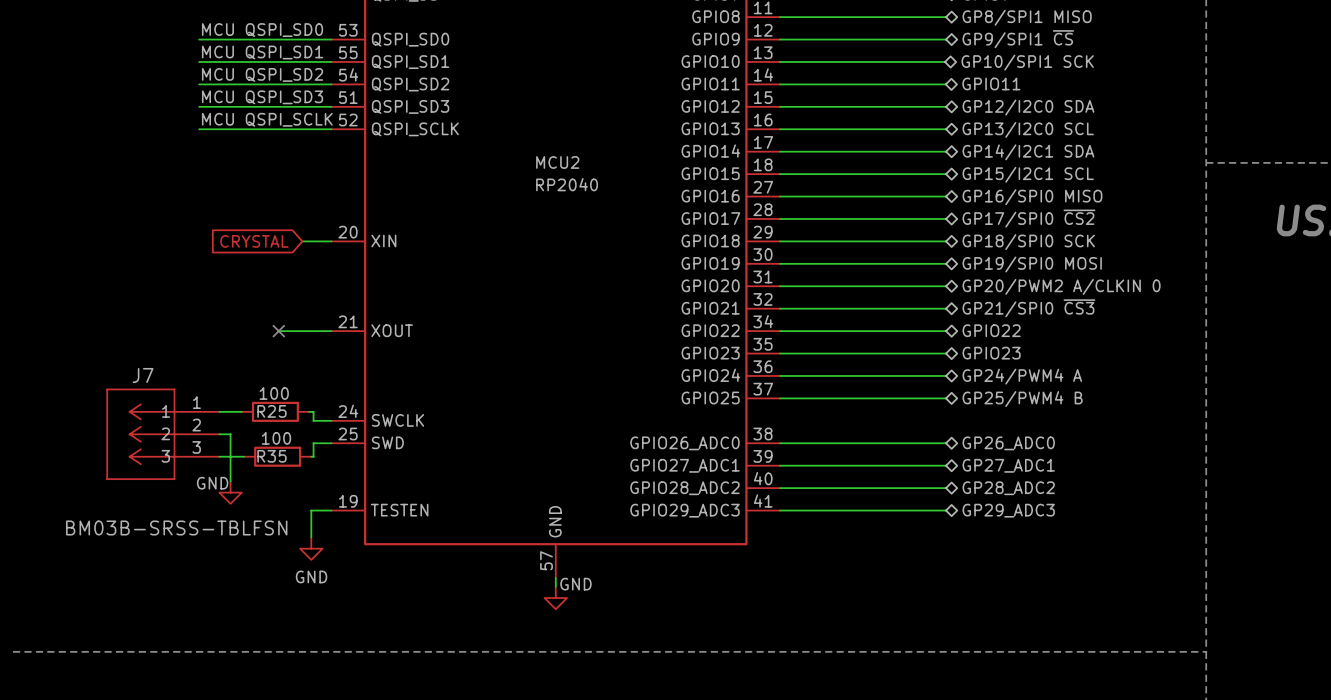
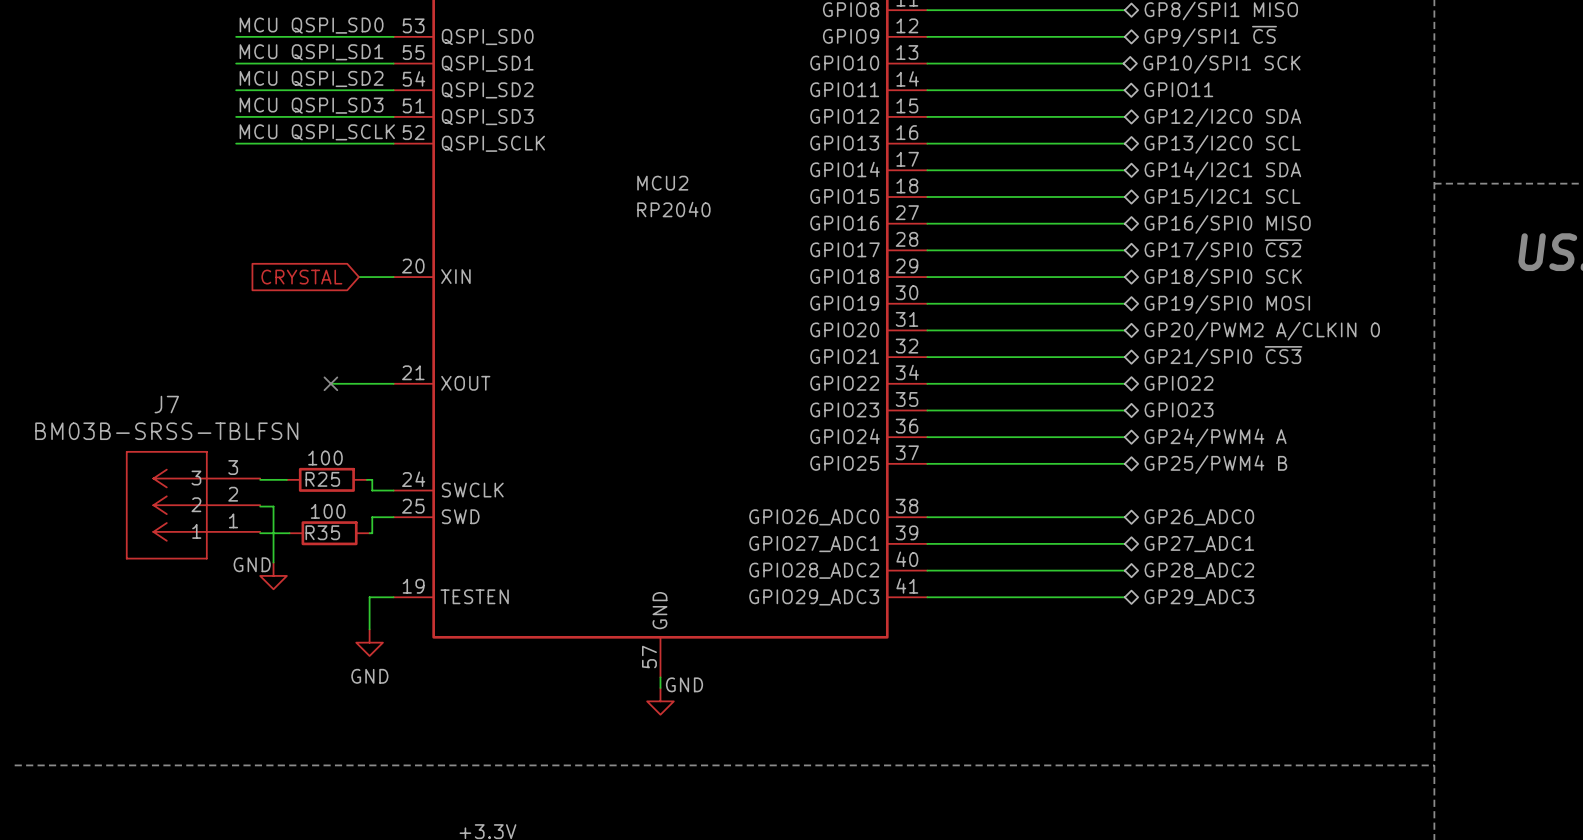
J7 name position: J7 (143, 375) -> J7 (166, 404)
J7 flip: as is (140, 434) -> up-down (166, 505)
J7 value position: BM03B-SRSS-TBLFSN (176, 527) -> BM03B-SRSS-TBLFSN (166, 431)

